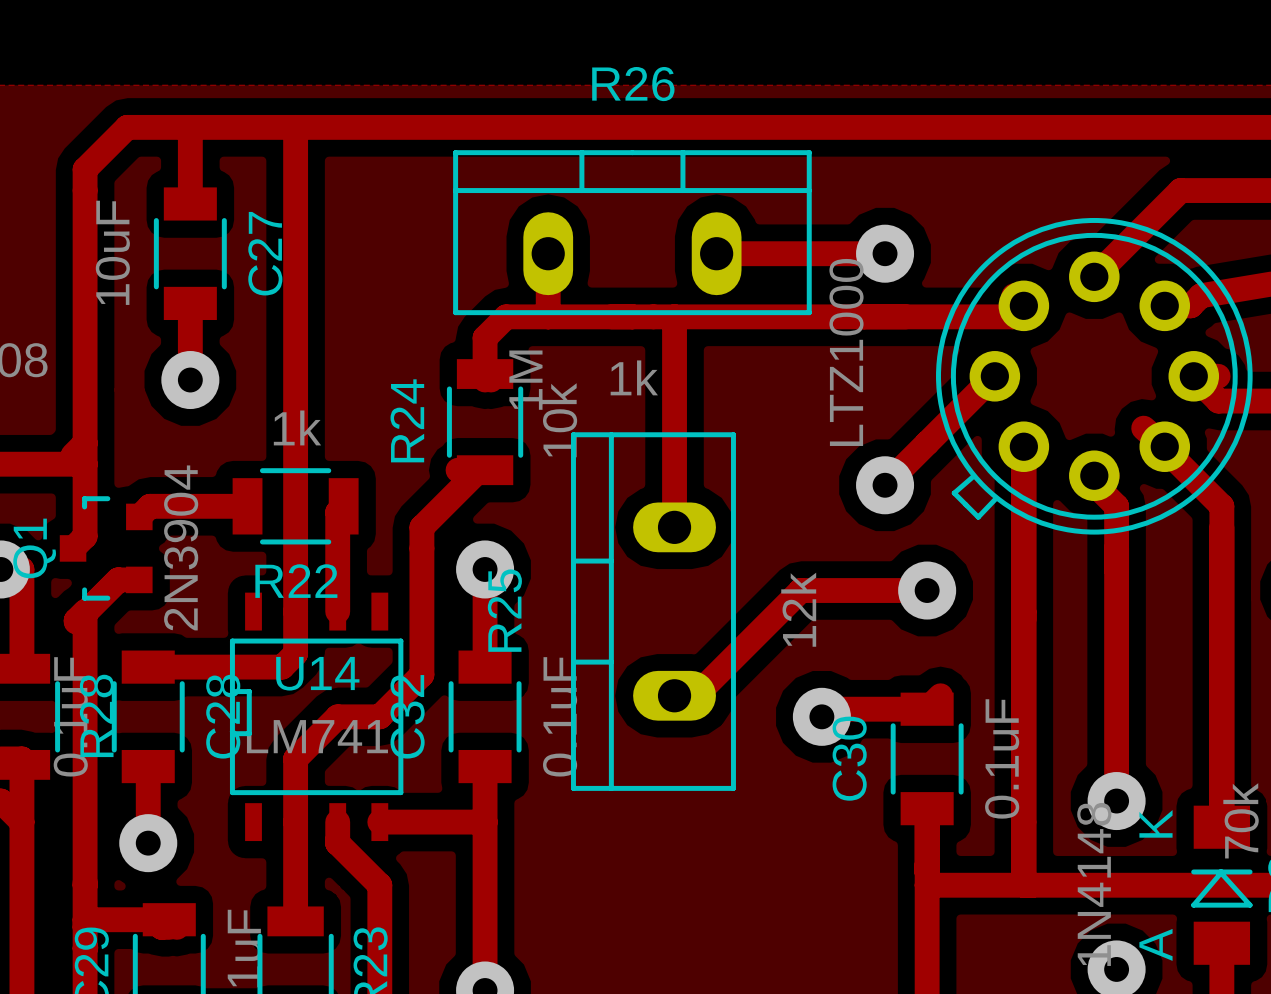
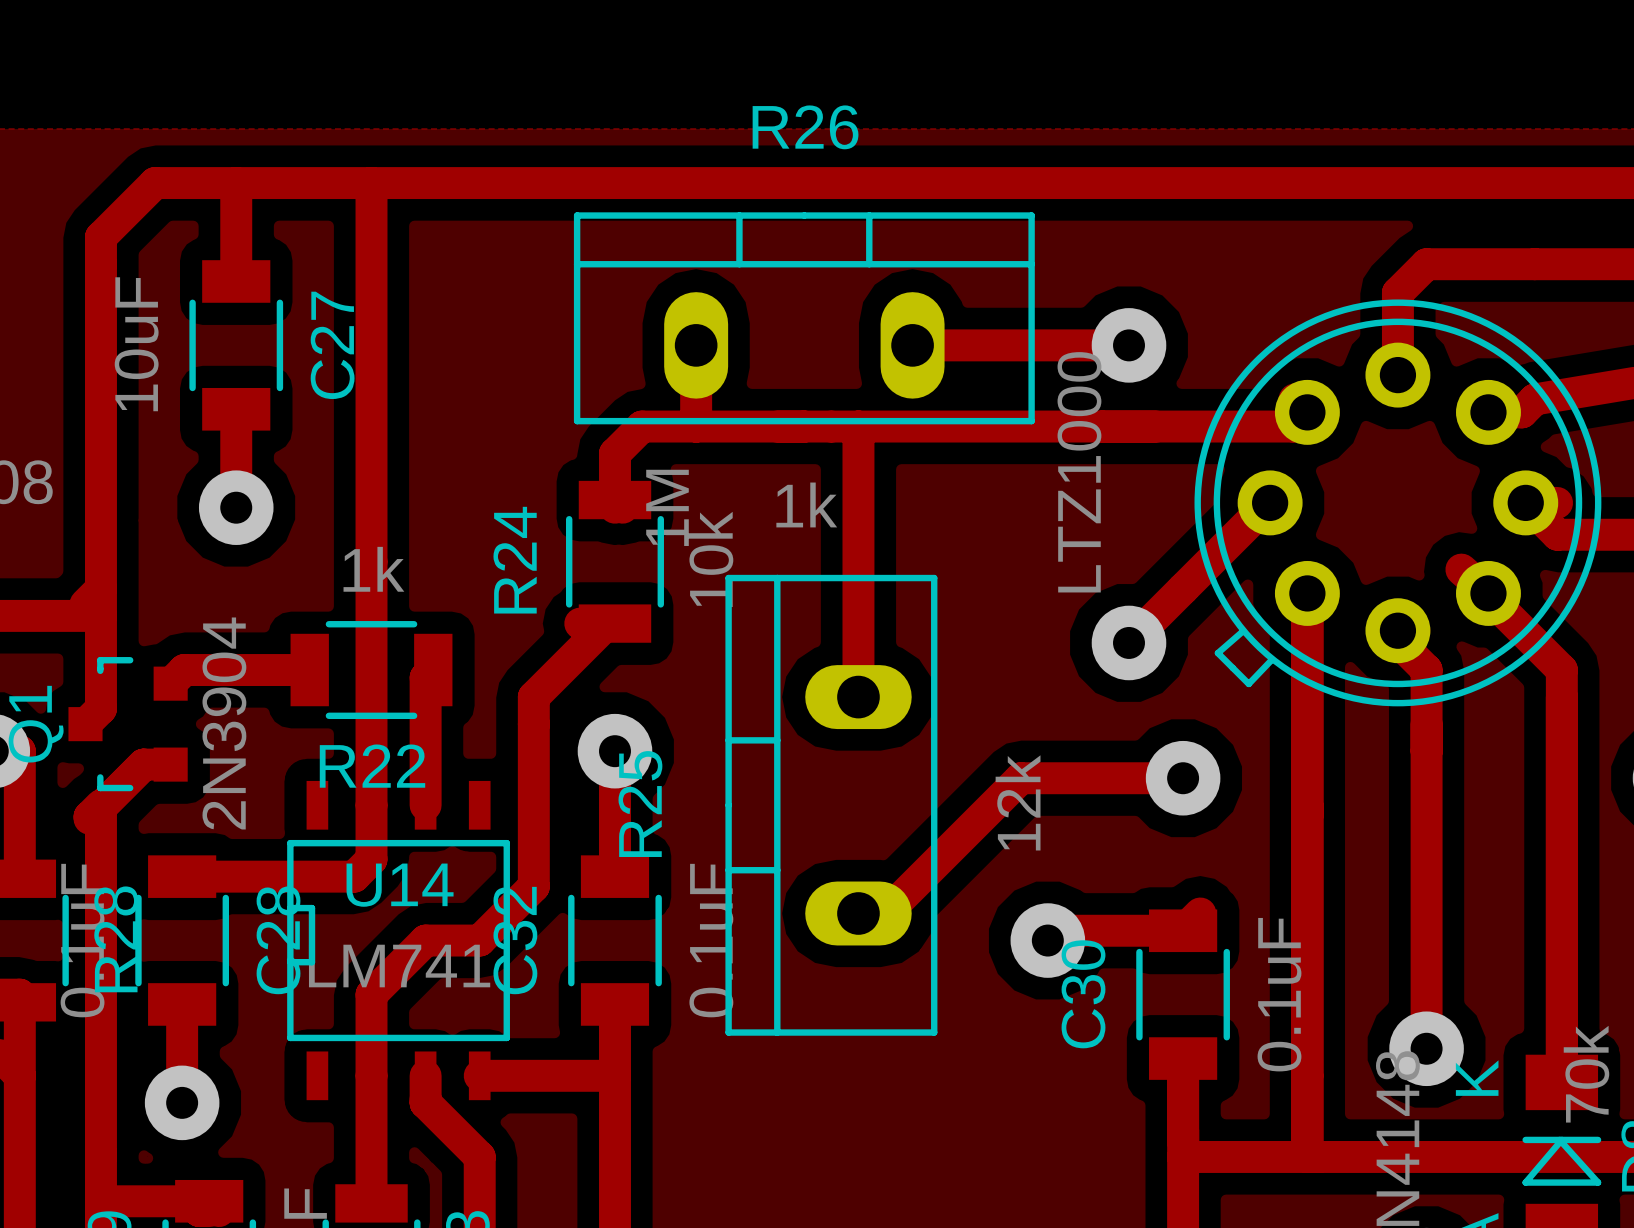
track: (1180, 190) (1094, 276) -> (1508, 264) (1426, 264) (1397, 292) (1397, 374)

